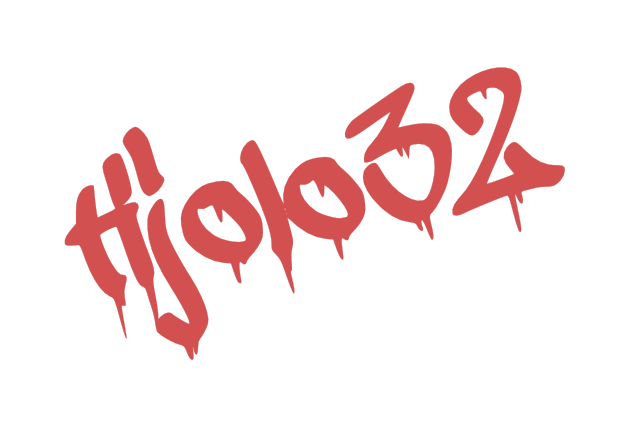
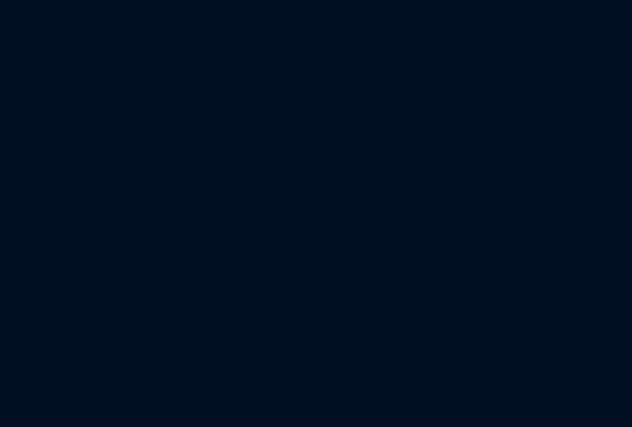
drawing: [64, 67, 565, 360] -> none

